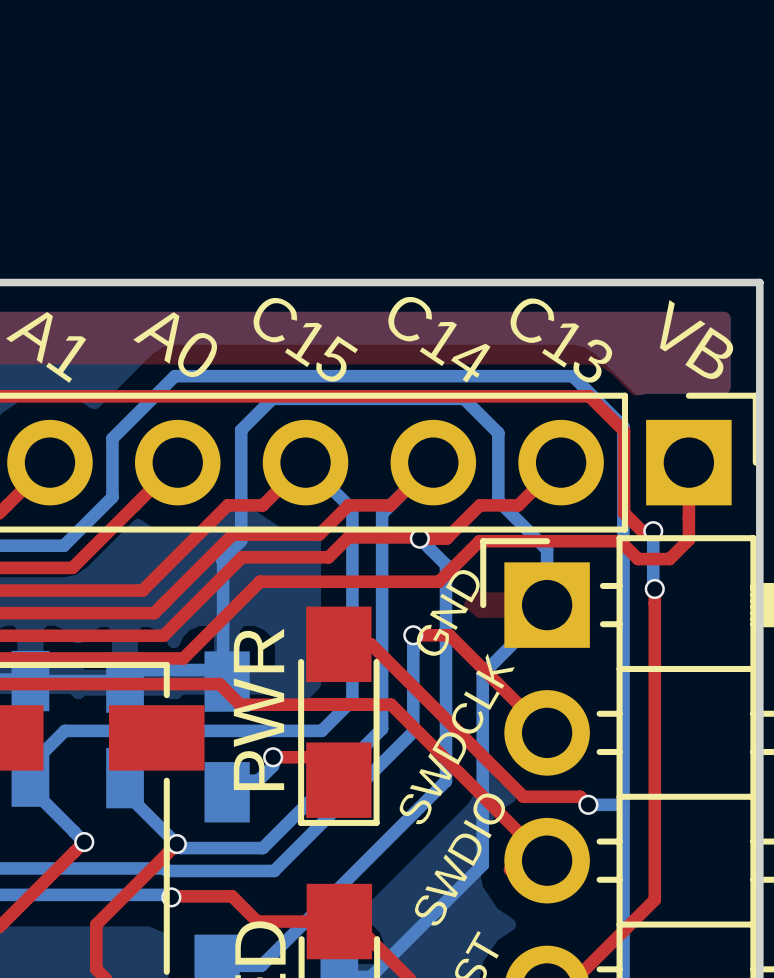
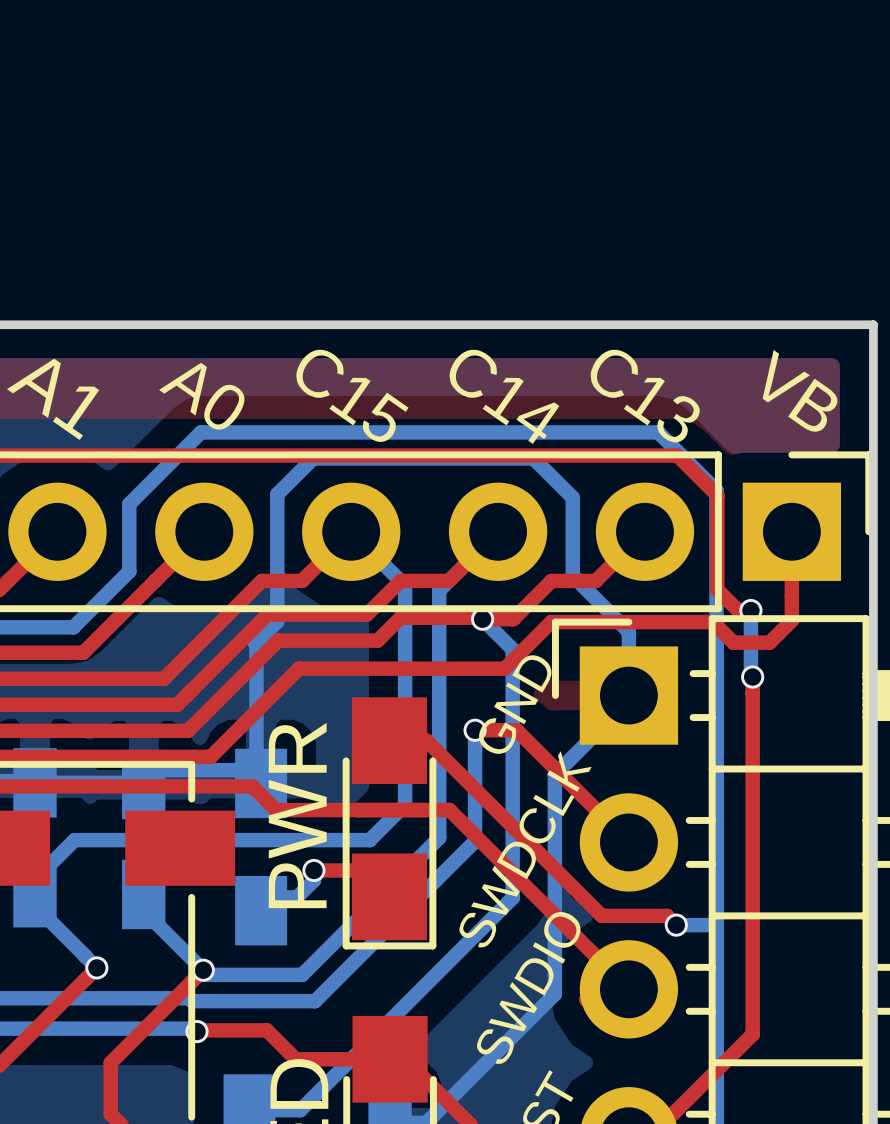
text rotation: 0° (305, 339) -> 1.5° clockwise (352, 395)
text rotation: 0° (439, 339) -> 1.5° clockwise (504, 396)
text rotation: 0° (698, 339) -> 1.5° clockwise (802, 390)
text rotation: 0° (561, 340) -> 1.5° clockwise (645, 395)
text rotation: 0° (175, 345) -> 1.5° clockwise (201, 397)

